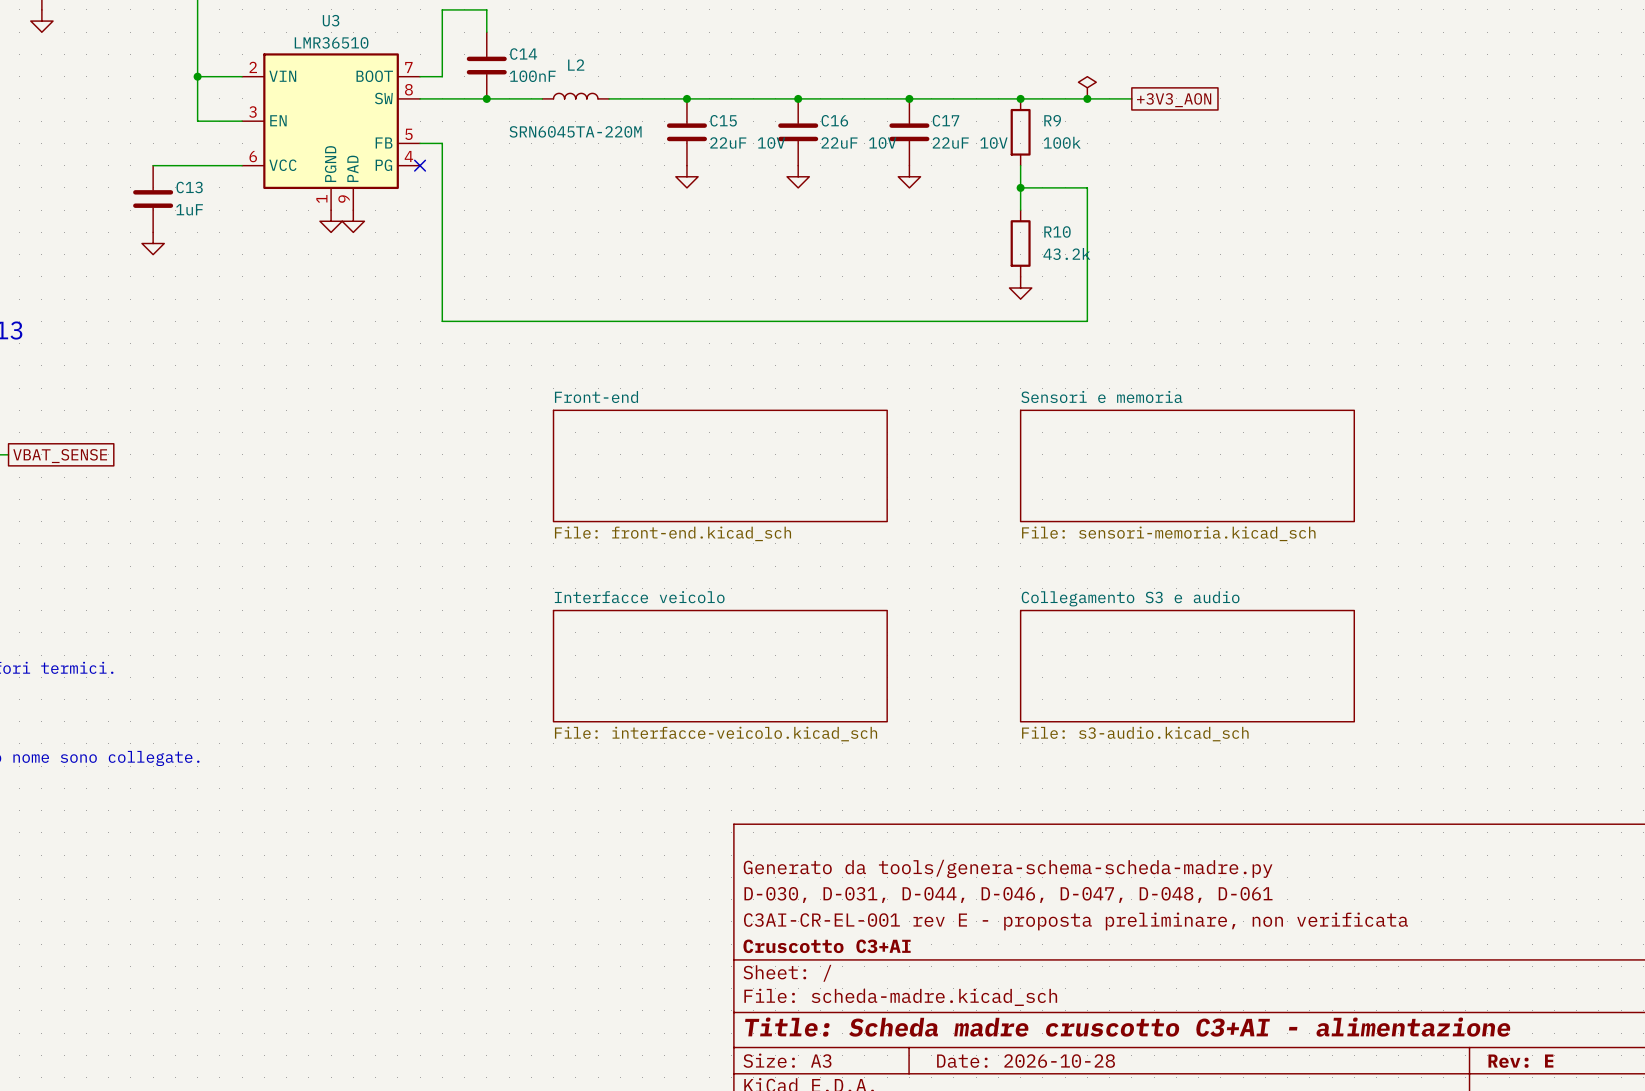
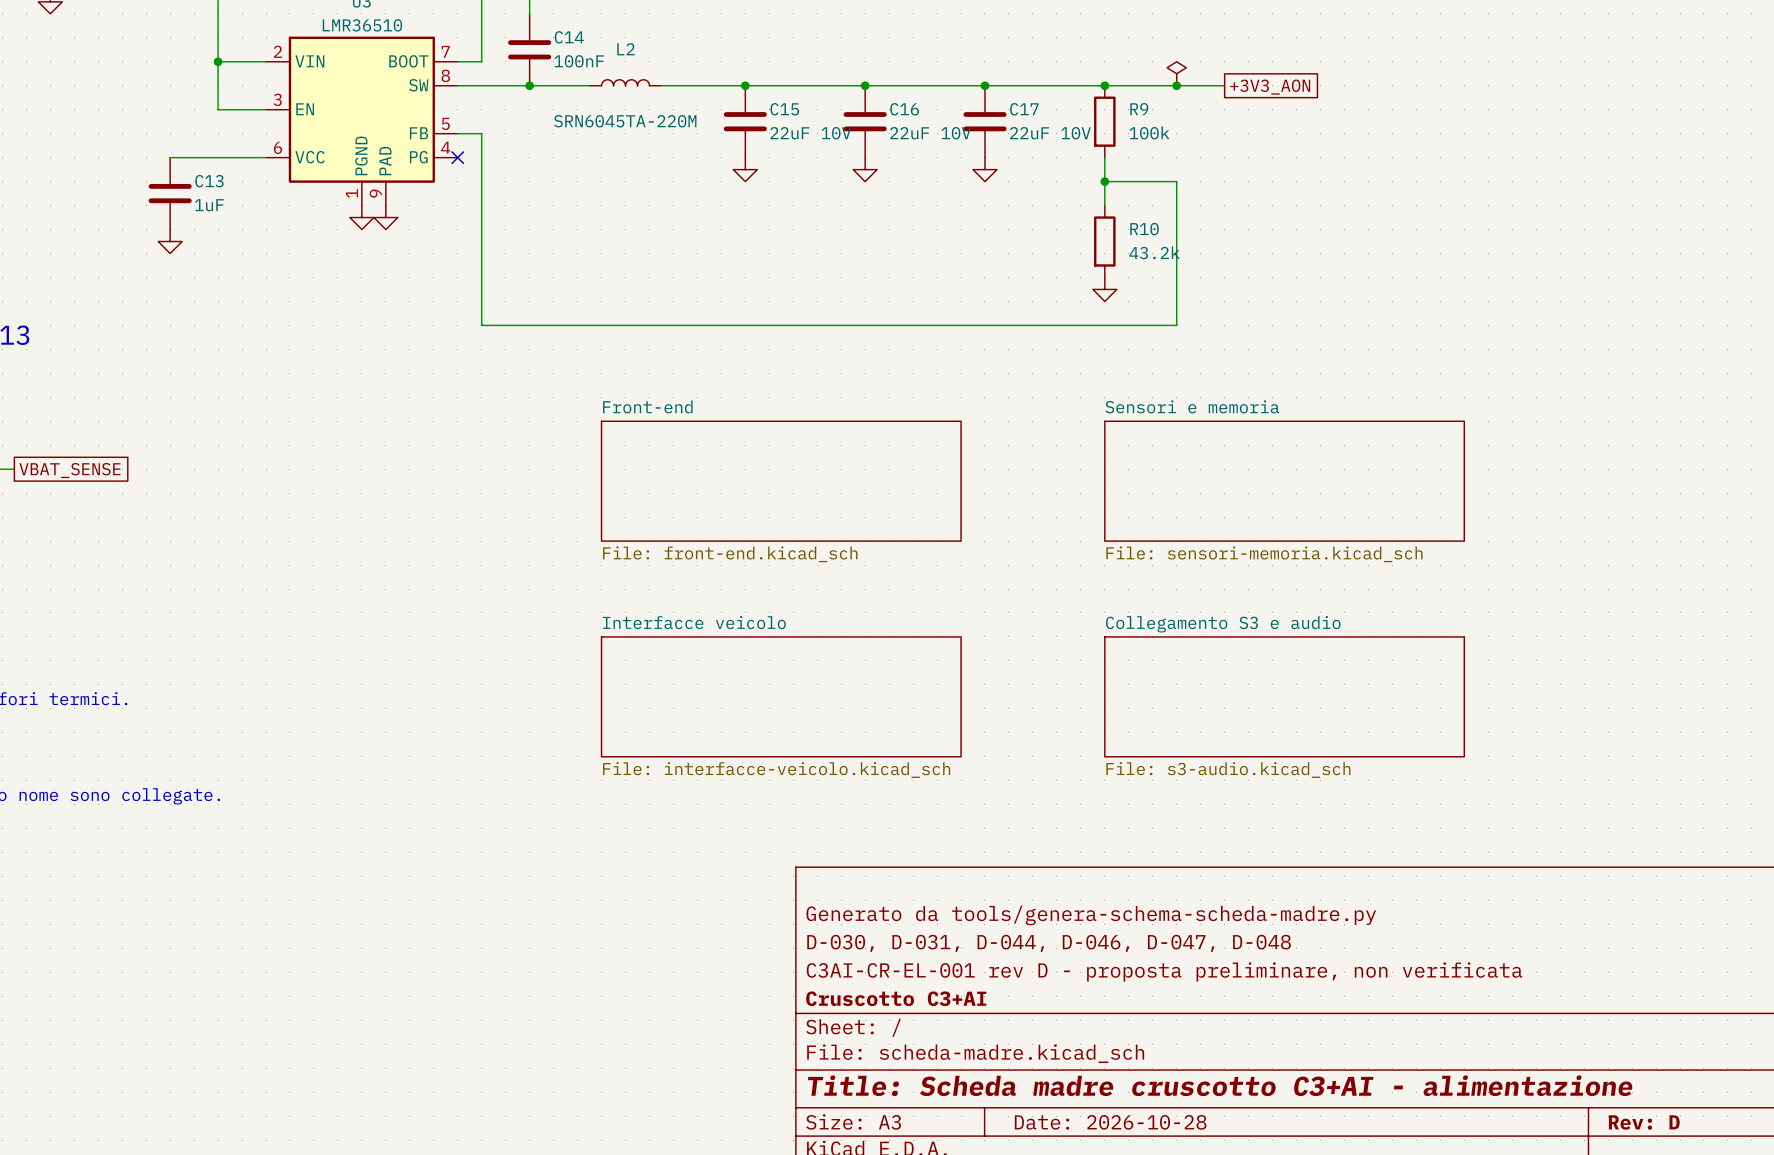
title block: D-030, D-031, D-044, D-046, D-047, D-048, D-061 (1008, 894) -> D-030, D-031, D-044, D-046, D-047, D-048 (1049, 943)
title block: C3AI-CR-EL-001 rev E - proposta preliminare, non verificata (1075, 921) -> C3AI-CR-EL-001 rev D - proposta preliminare, non verificata (1164, 971)
title block: Rev: E (1520, 1061) -> Rev: D (1644, 1122)

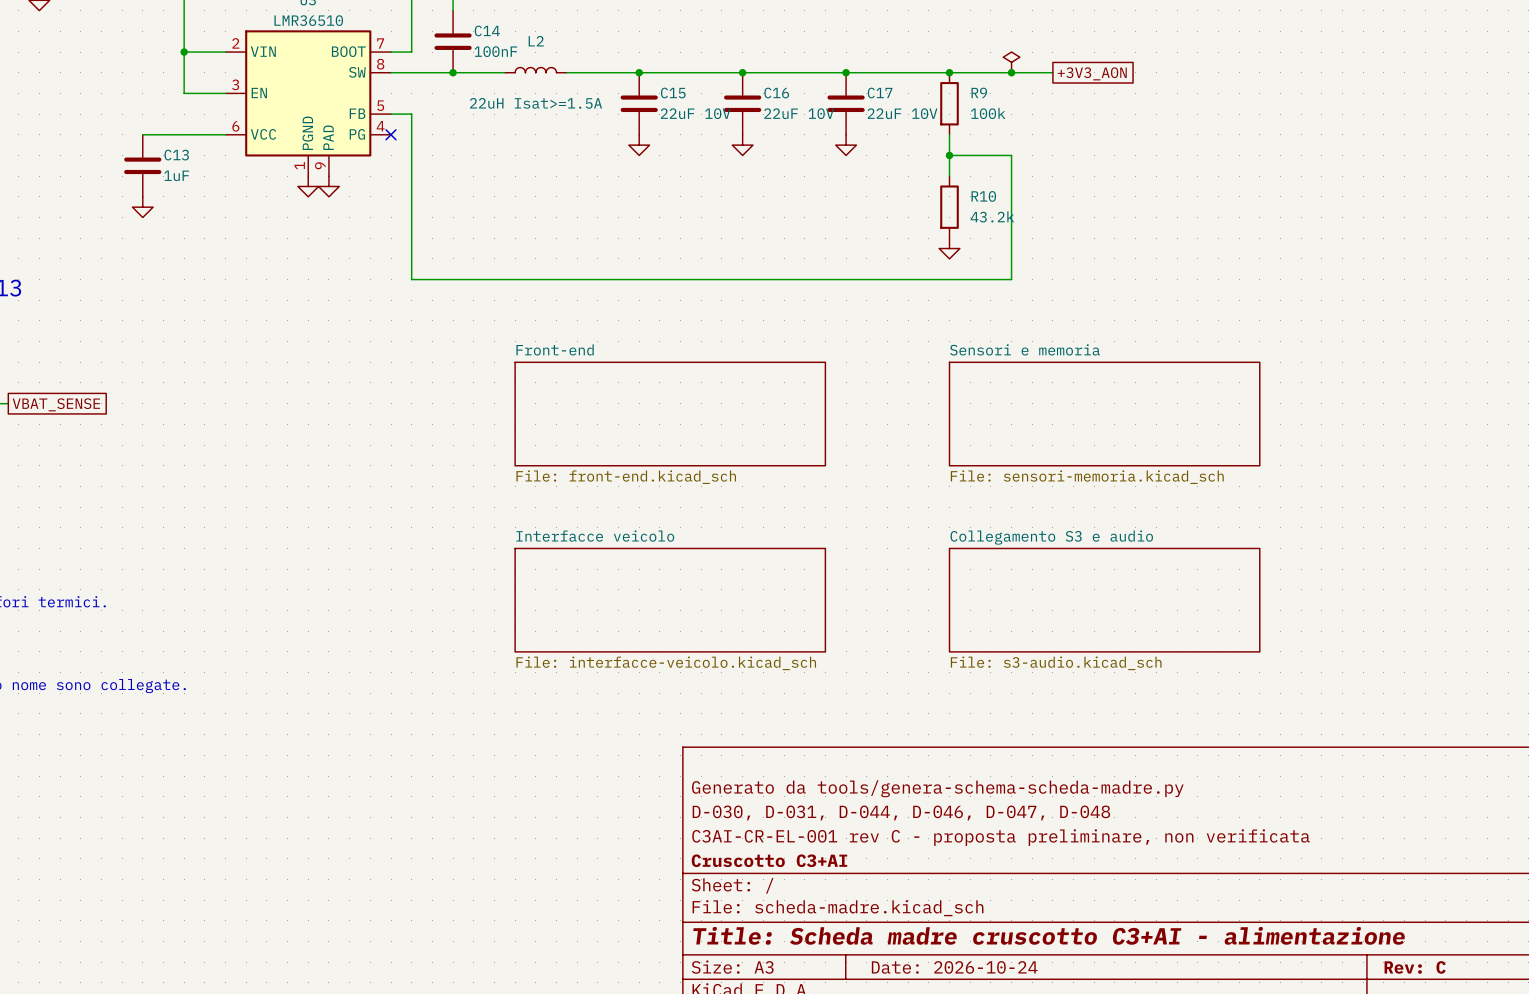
L2 value: SRN6045TA-220M (625, 121) -> 22uH Isat>=1.5A (536, 103)
title block: C3AI-CR-EL-001 rev D - proposta preliminare, non verificata (1164, 971) -> C3AI-CR-EL-001 rev C - proposta preliminare, non verificata (1000, 837)
title block: Date: 2026-10-28 (1110, 1122) -> Date: 2026-10-24 (954, 967)
title block: Rev: D (1644, 1122) -> Rev: C (1415, 967)

